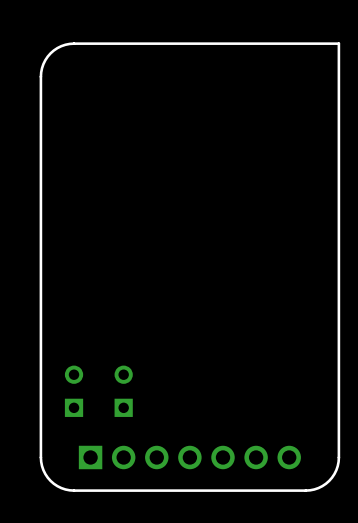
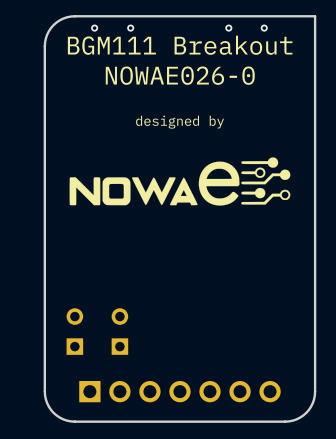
via: none -> (94, 28)
via: none -> (130, 28)
via: none -> (228, 28)
via: none -> (264, 28)
text: none -> BGM111 Breakout (180, 45)
text: none -> NOWAE026-0 (180, 75)
text: none -> designed by (180, 122)
drawing: none -> [69, 157, 291, 206]

